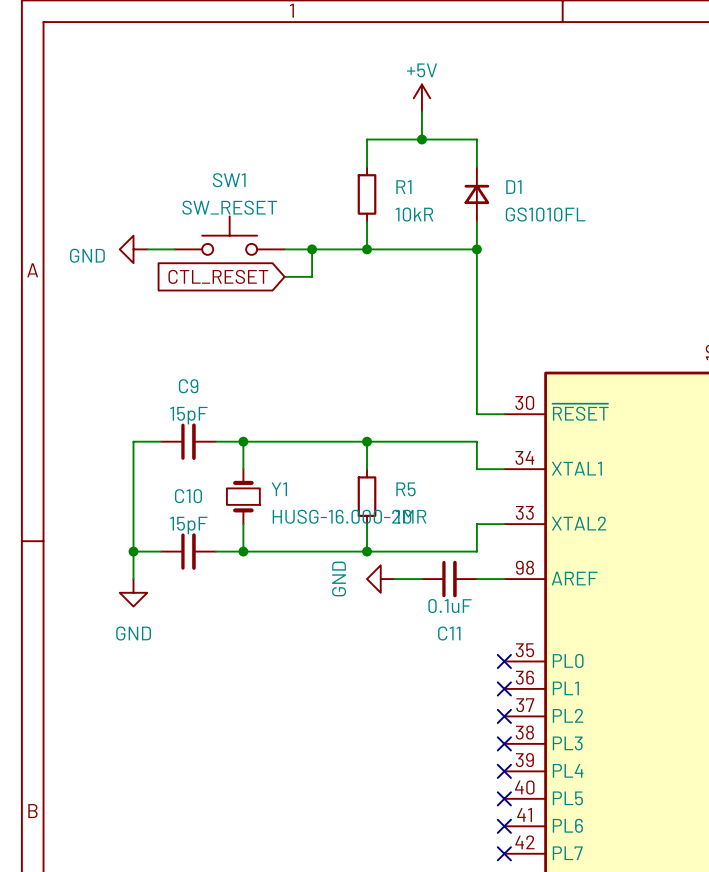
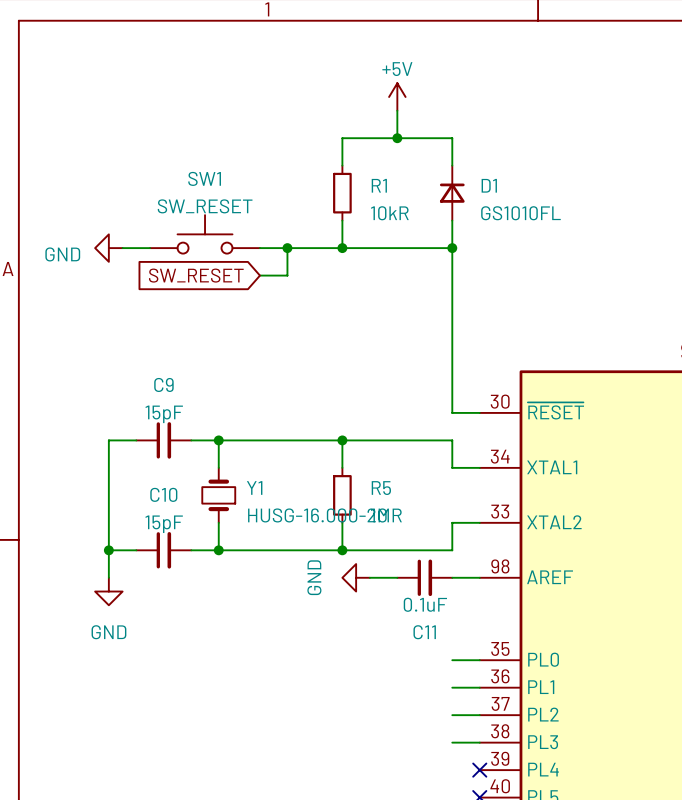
global label: CTL_RESET (218, 276) -> SW_RESET (196, 275)
wire: none -> (452, 660) (479, 660)
no-connect mark: (504, 661) -> none
wire: none -> (452, 687) (479, 687)
no-connect mark: (504, 688) -> none
wire: none -> (452, 715) (479, 715)
no-connect mark: (504, 716) -> none
wire: none -> (452, 742) (479, 742)
no-connect mark: (504, 743) -> none

